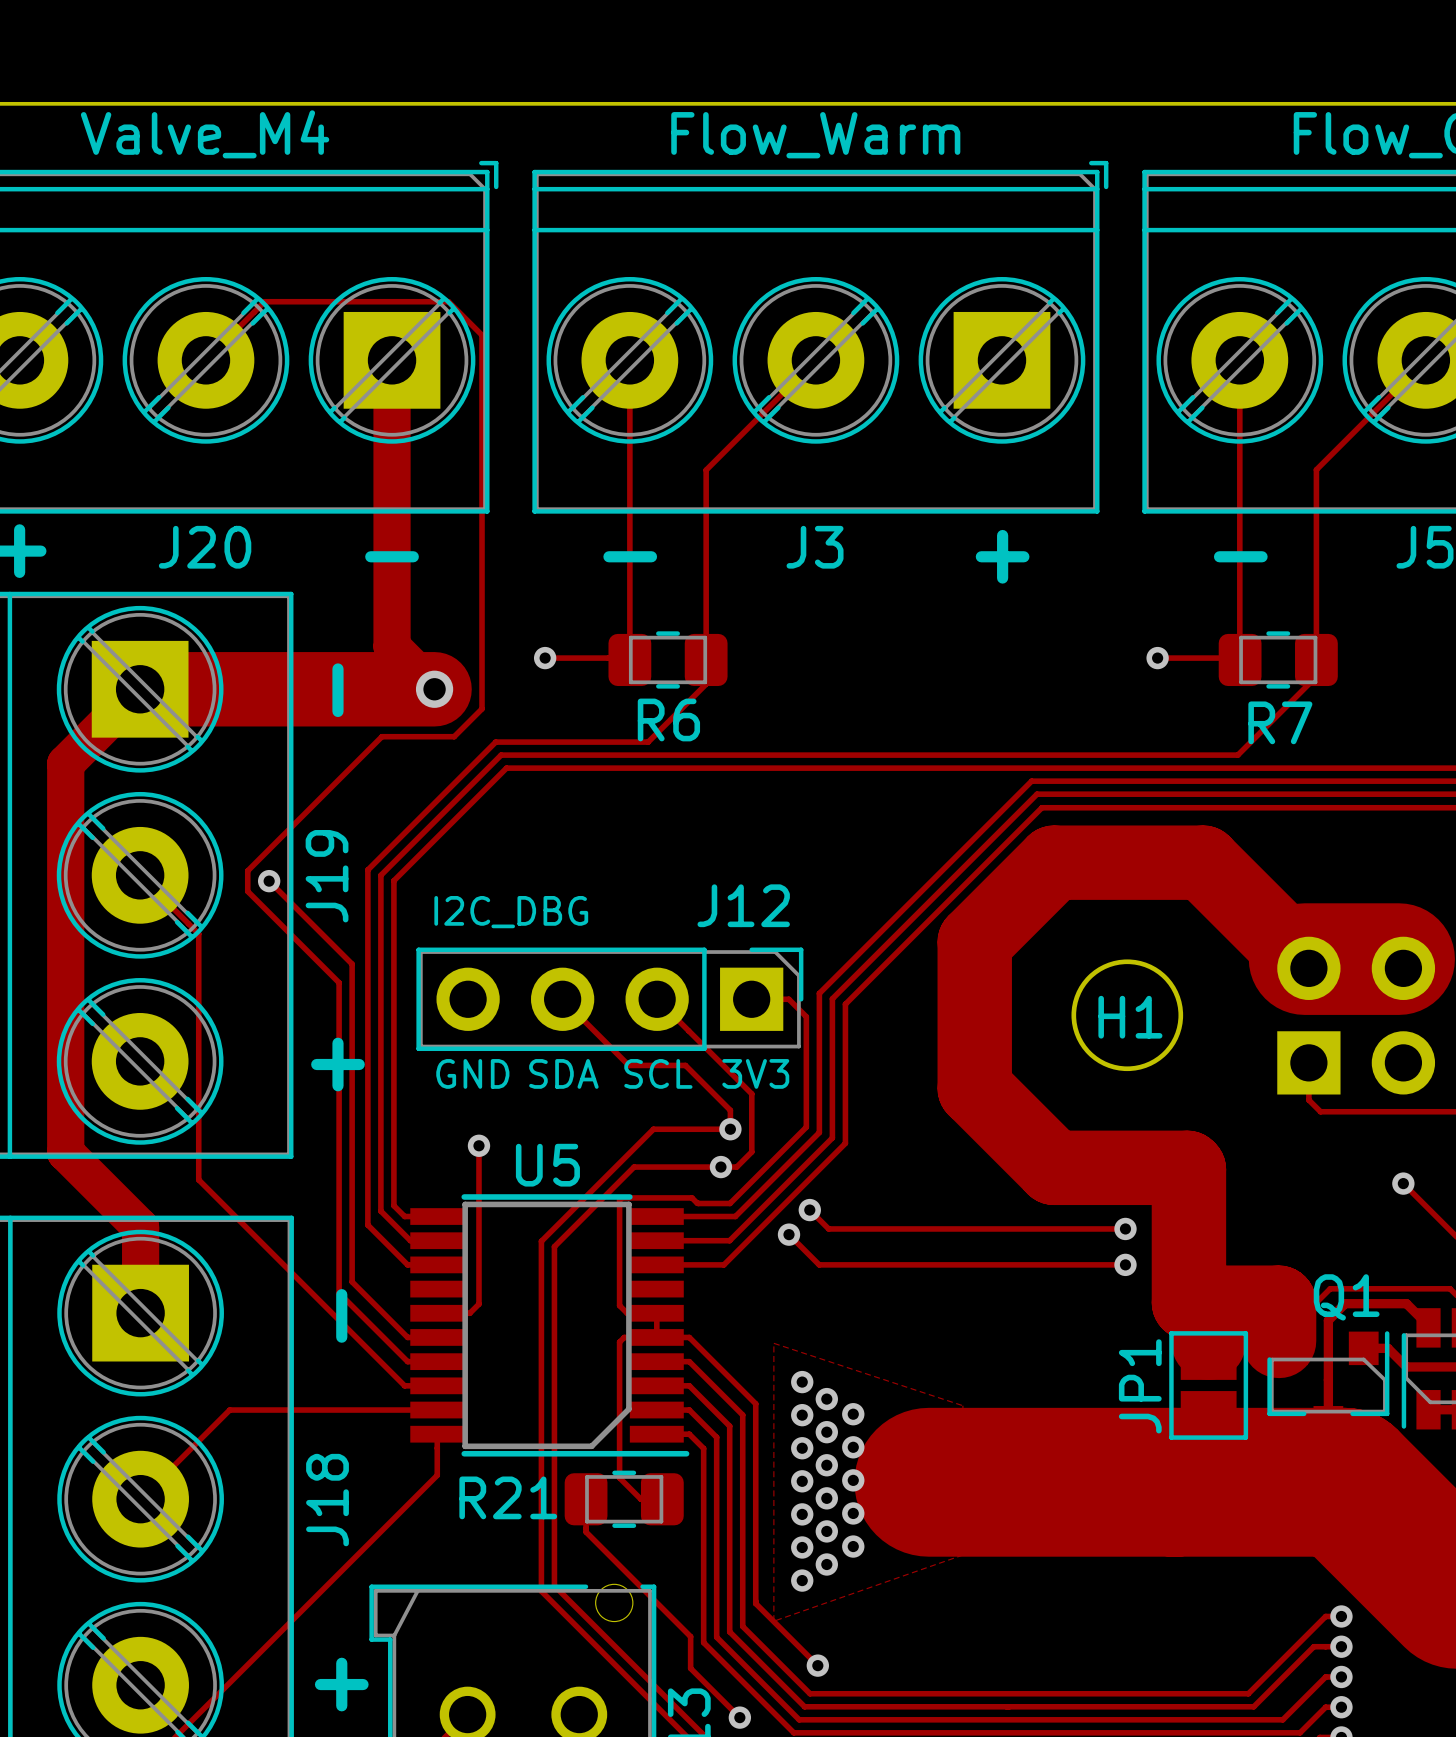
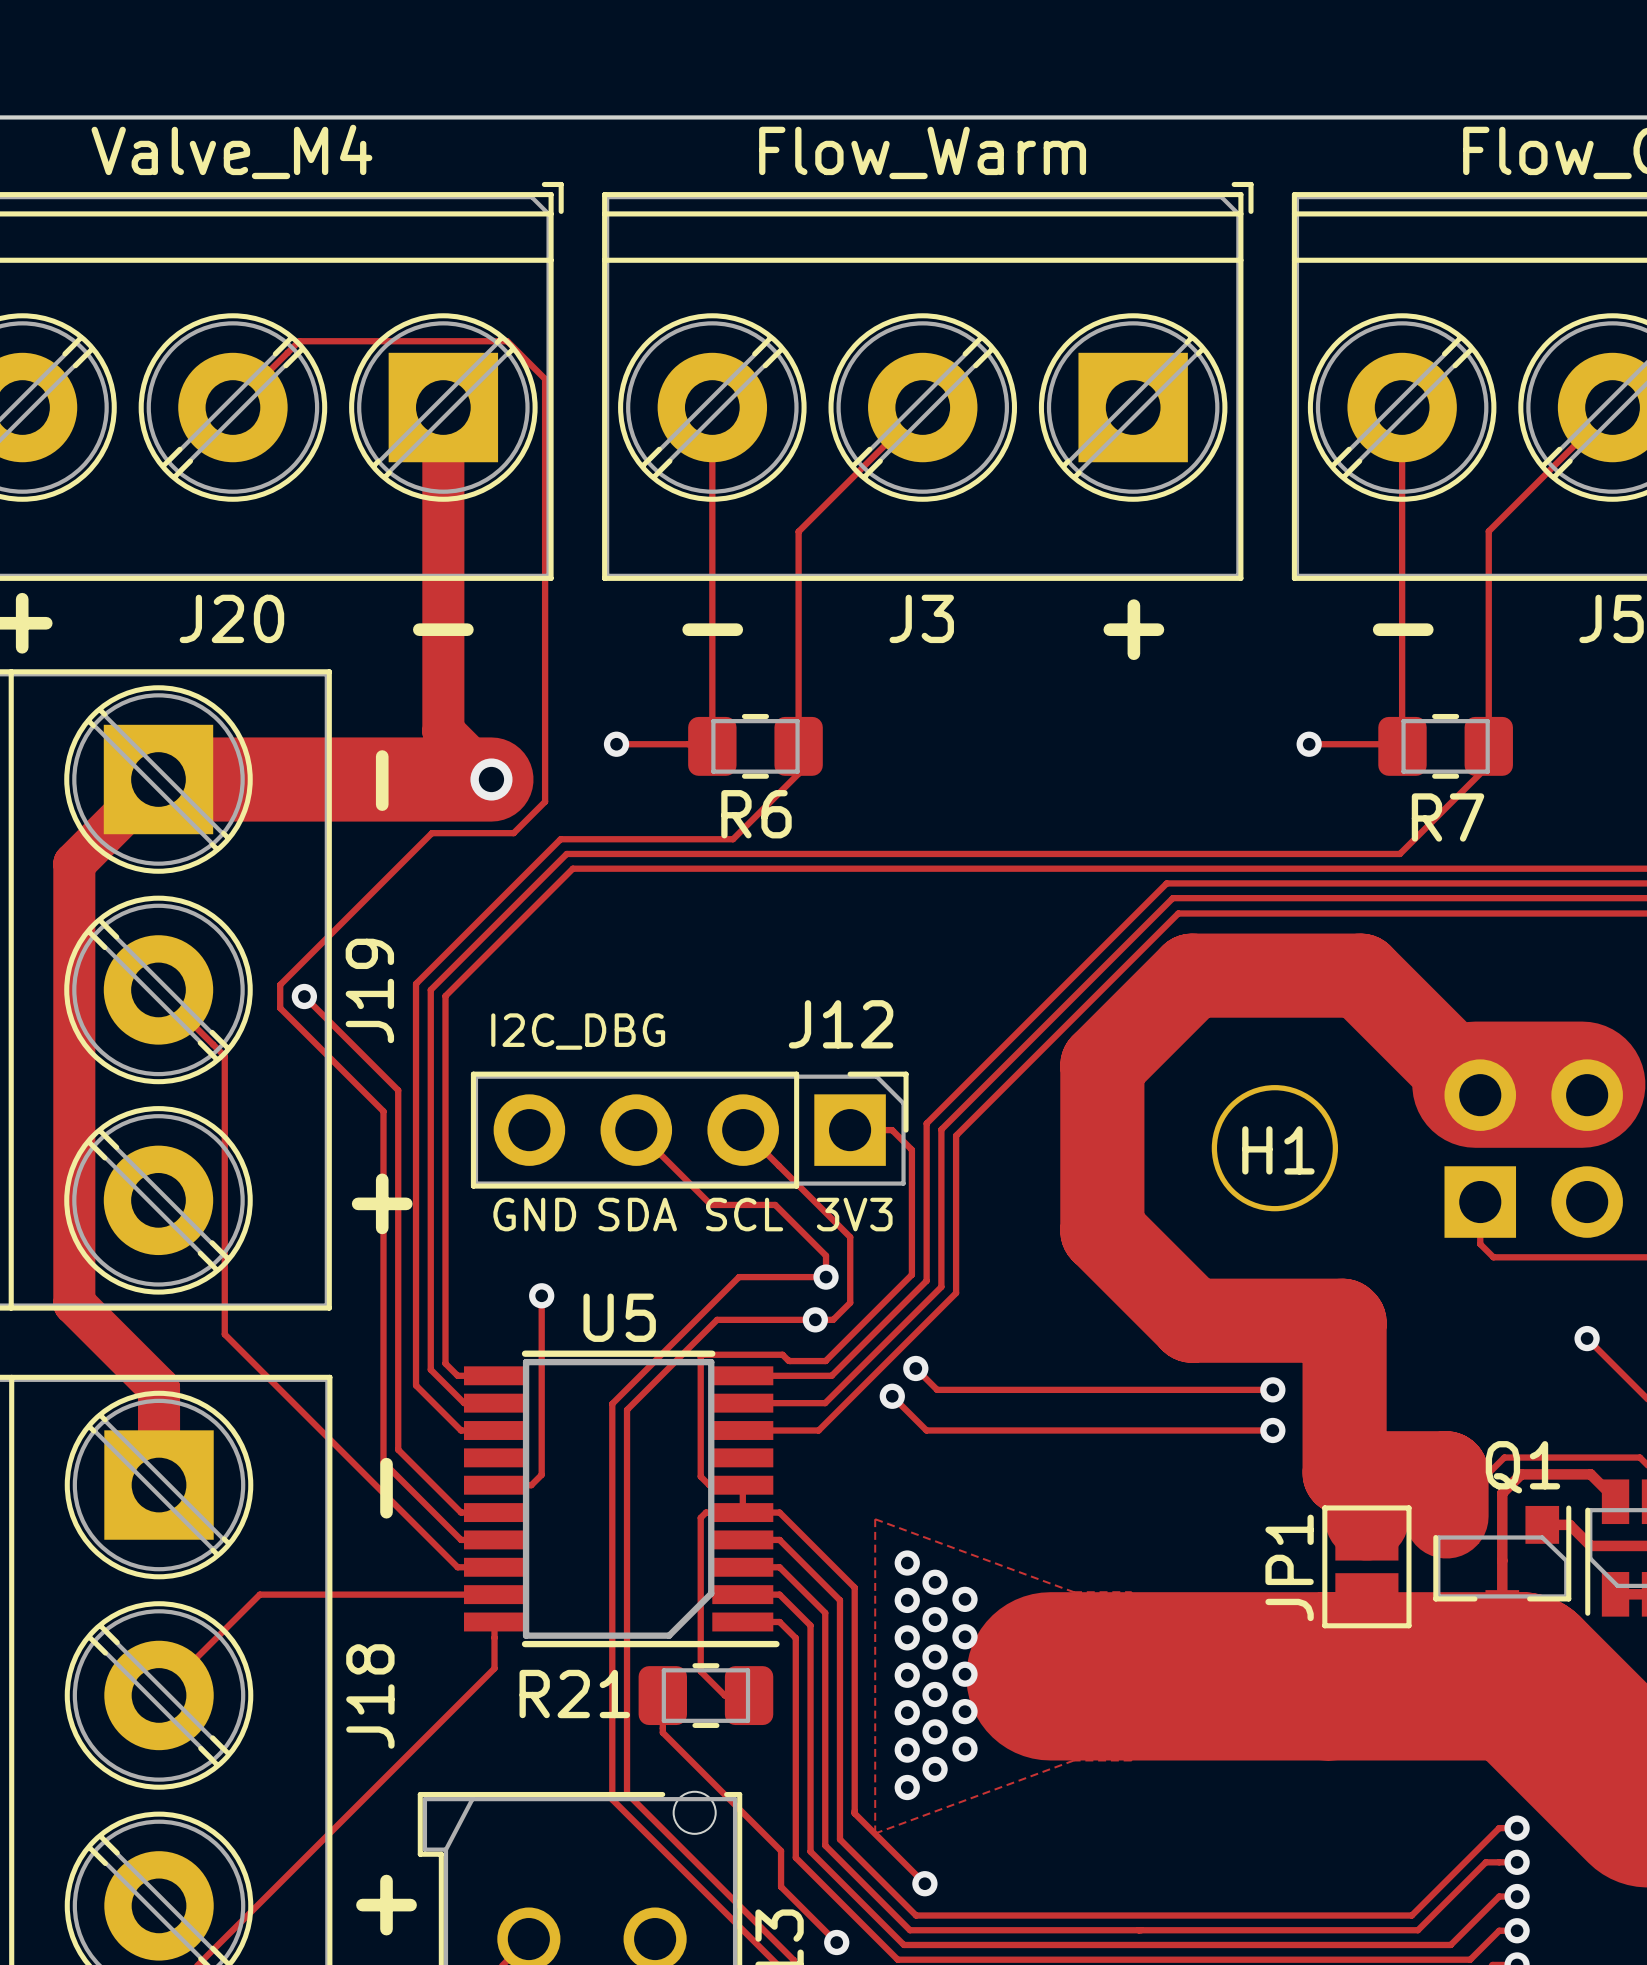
zone outline: (773, 1343) (962, 1405) (962, 1555) (773, 1621) -> (875, 1519) (1074, 1592) (1131, 1592) (1131, 1760) (1074, 1760) (875, 1833)

